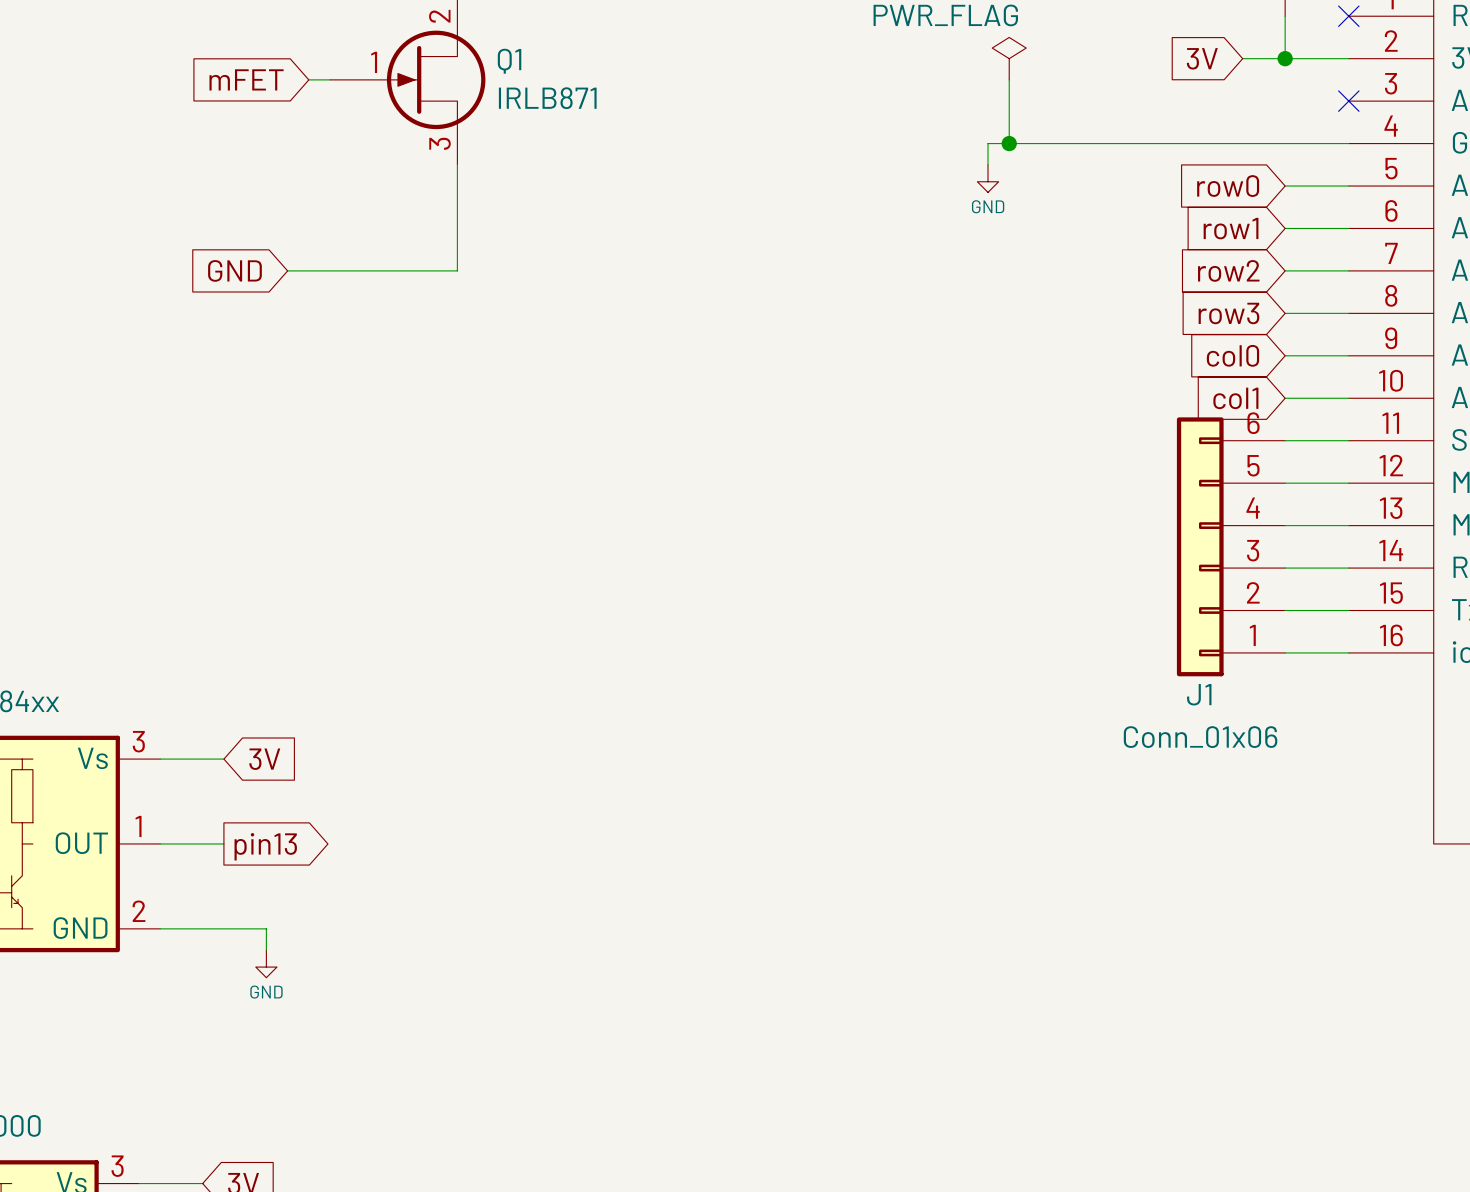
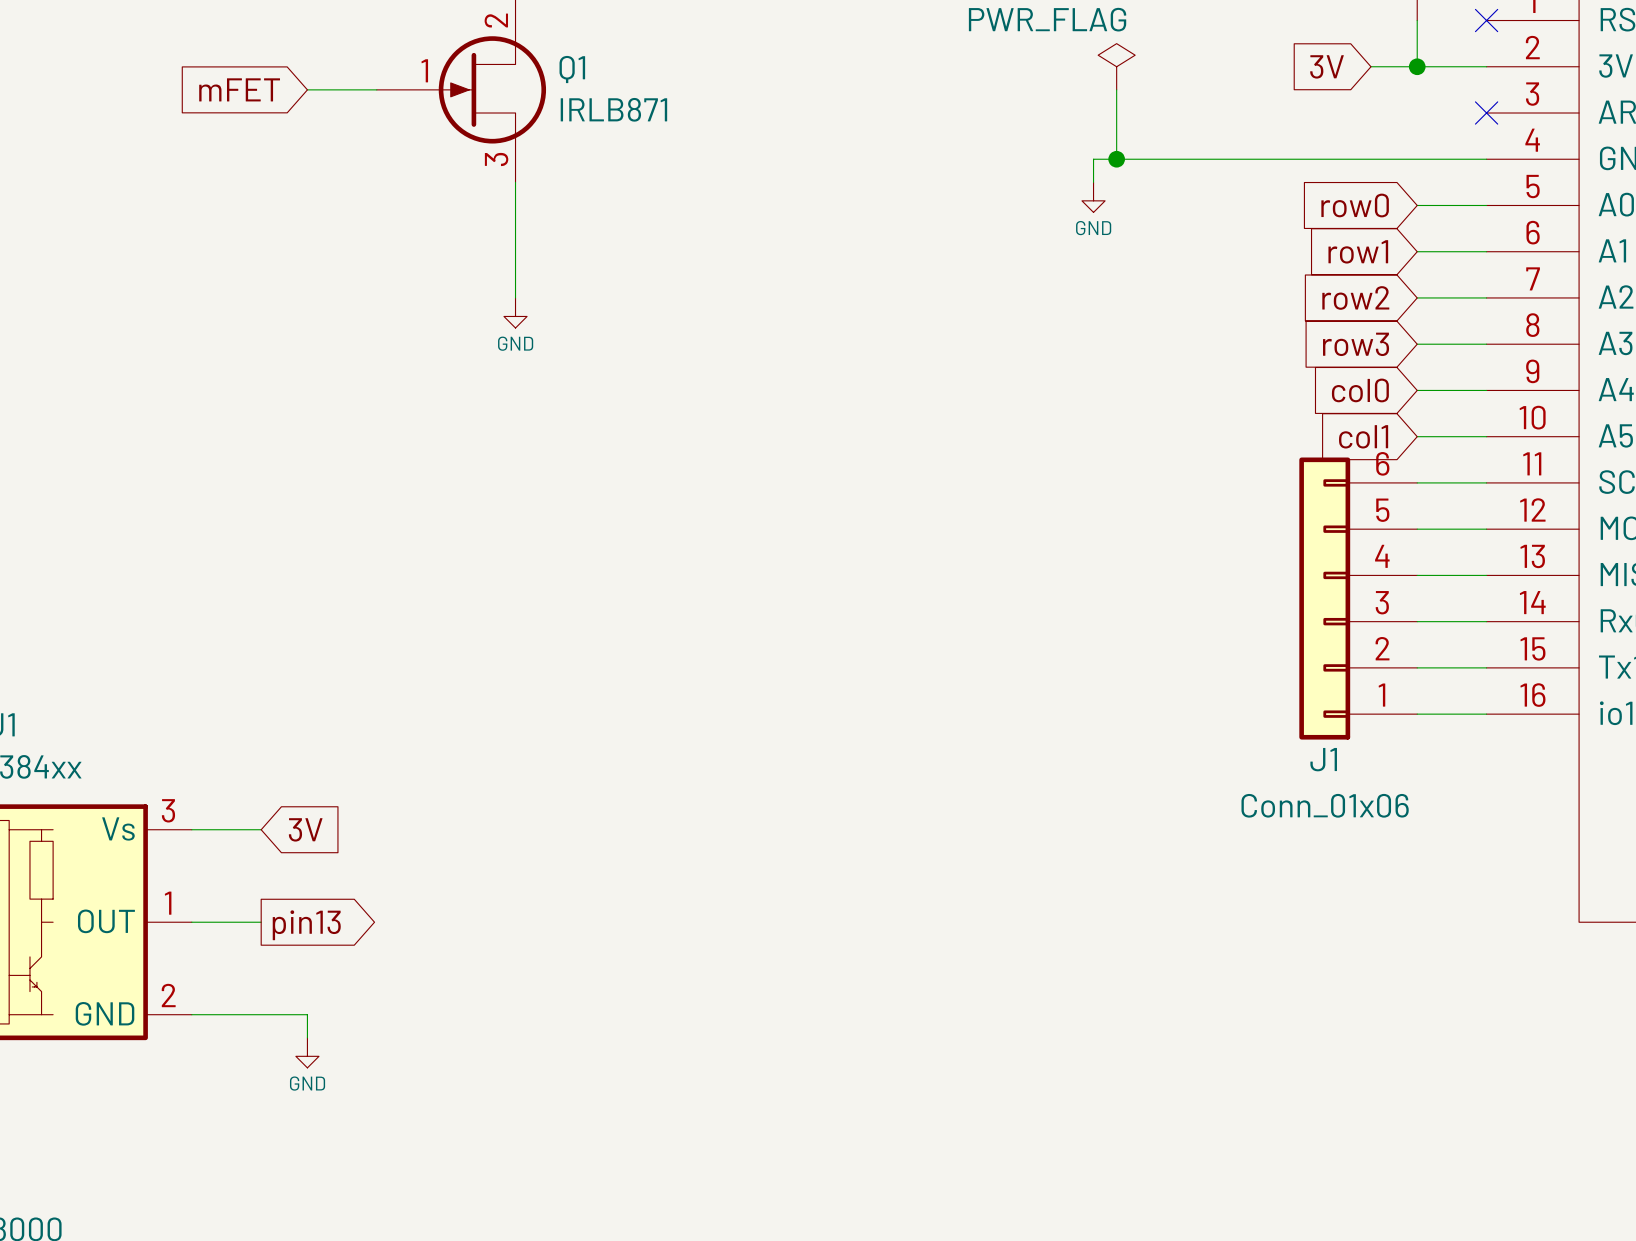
global label position: mFET (246, 79) -> mFET (239, 89)
wire: none -> (307, 89) (353, 89)
global label: GND (234, 270) -> none
wire: (287, 270) (457, 270) -> none
power symbol: none -> GND (515, 312)

